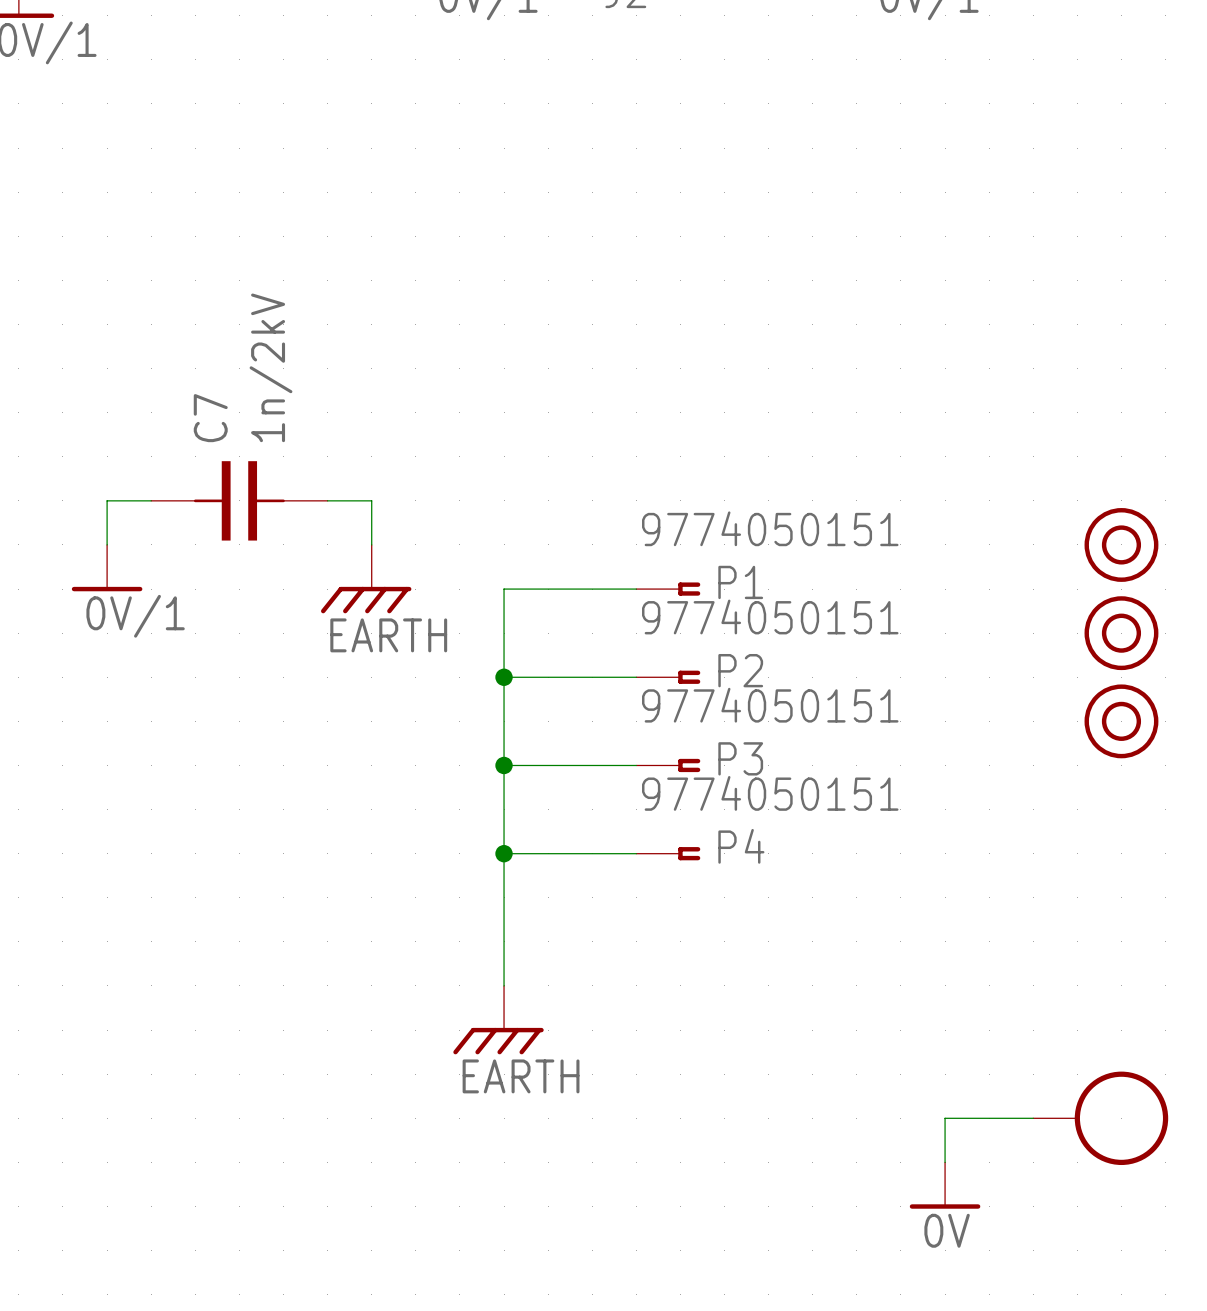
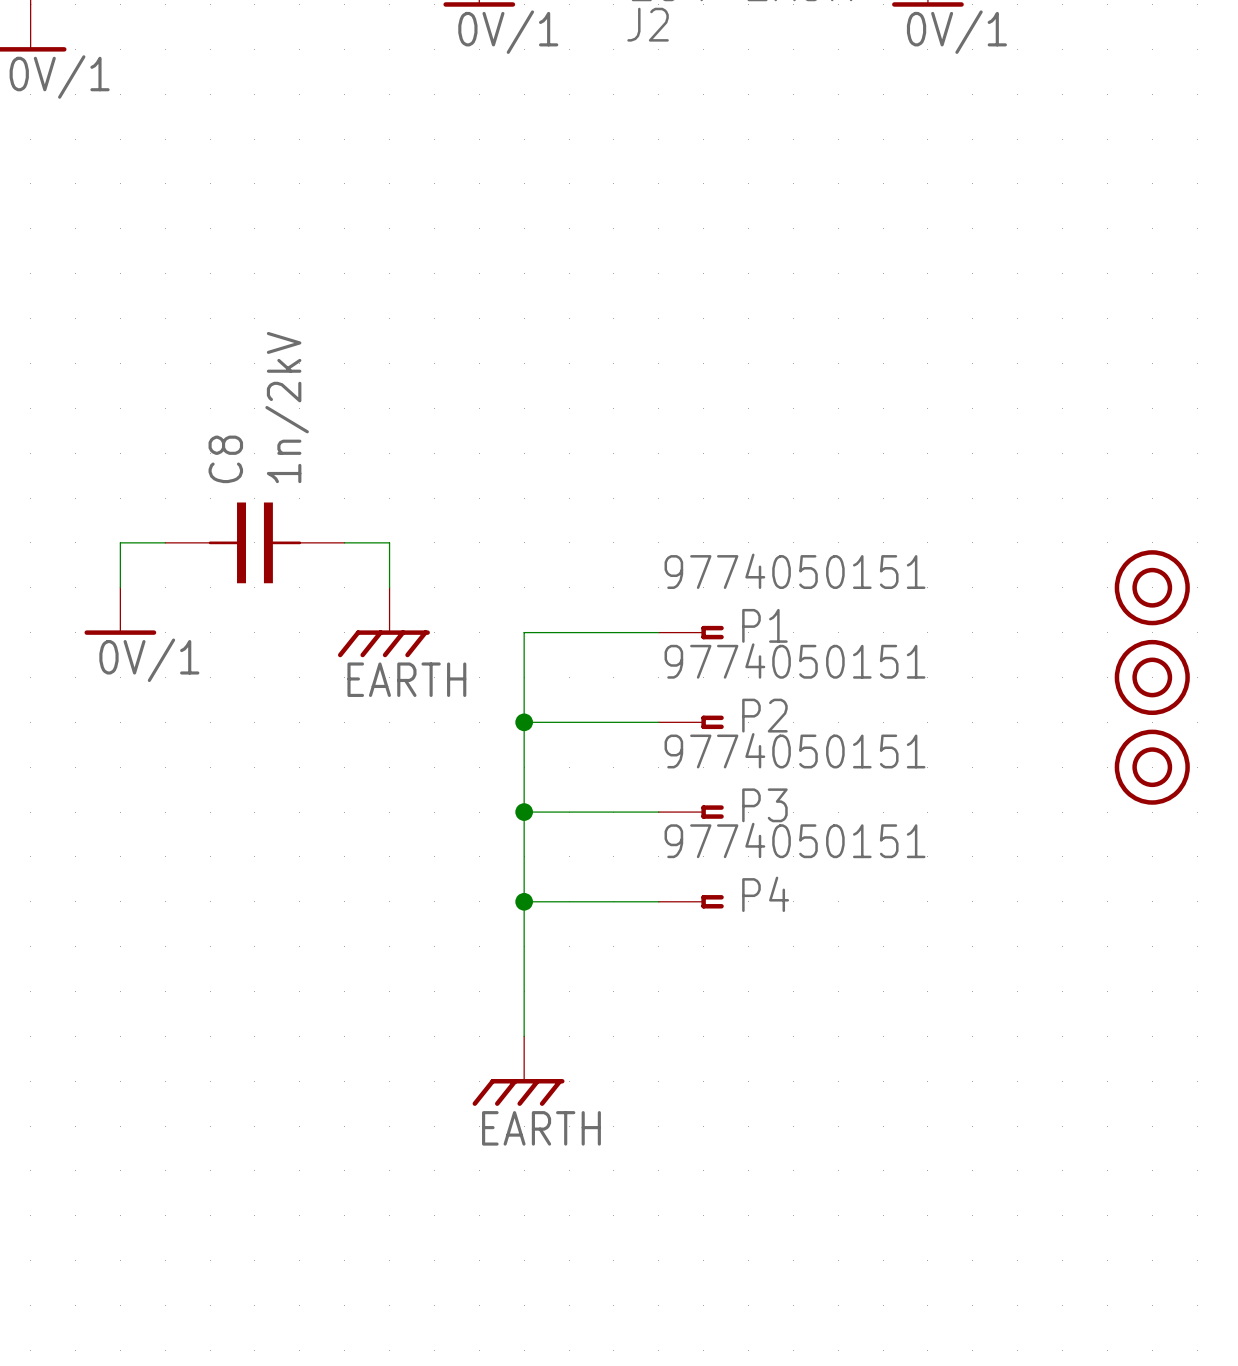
C7 name: C7 (210, 418) -> C8 (225, 459)
wire: (1033, 1118) (945, 1118) (945, 1162) -> none
part: (1100, 1118) -> none
power symbol: 0V (945, 1185) -> none

